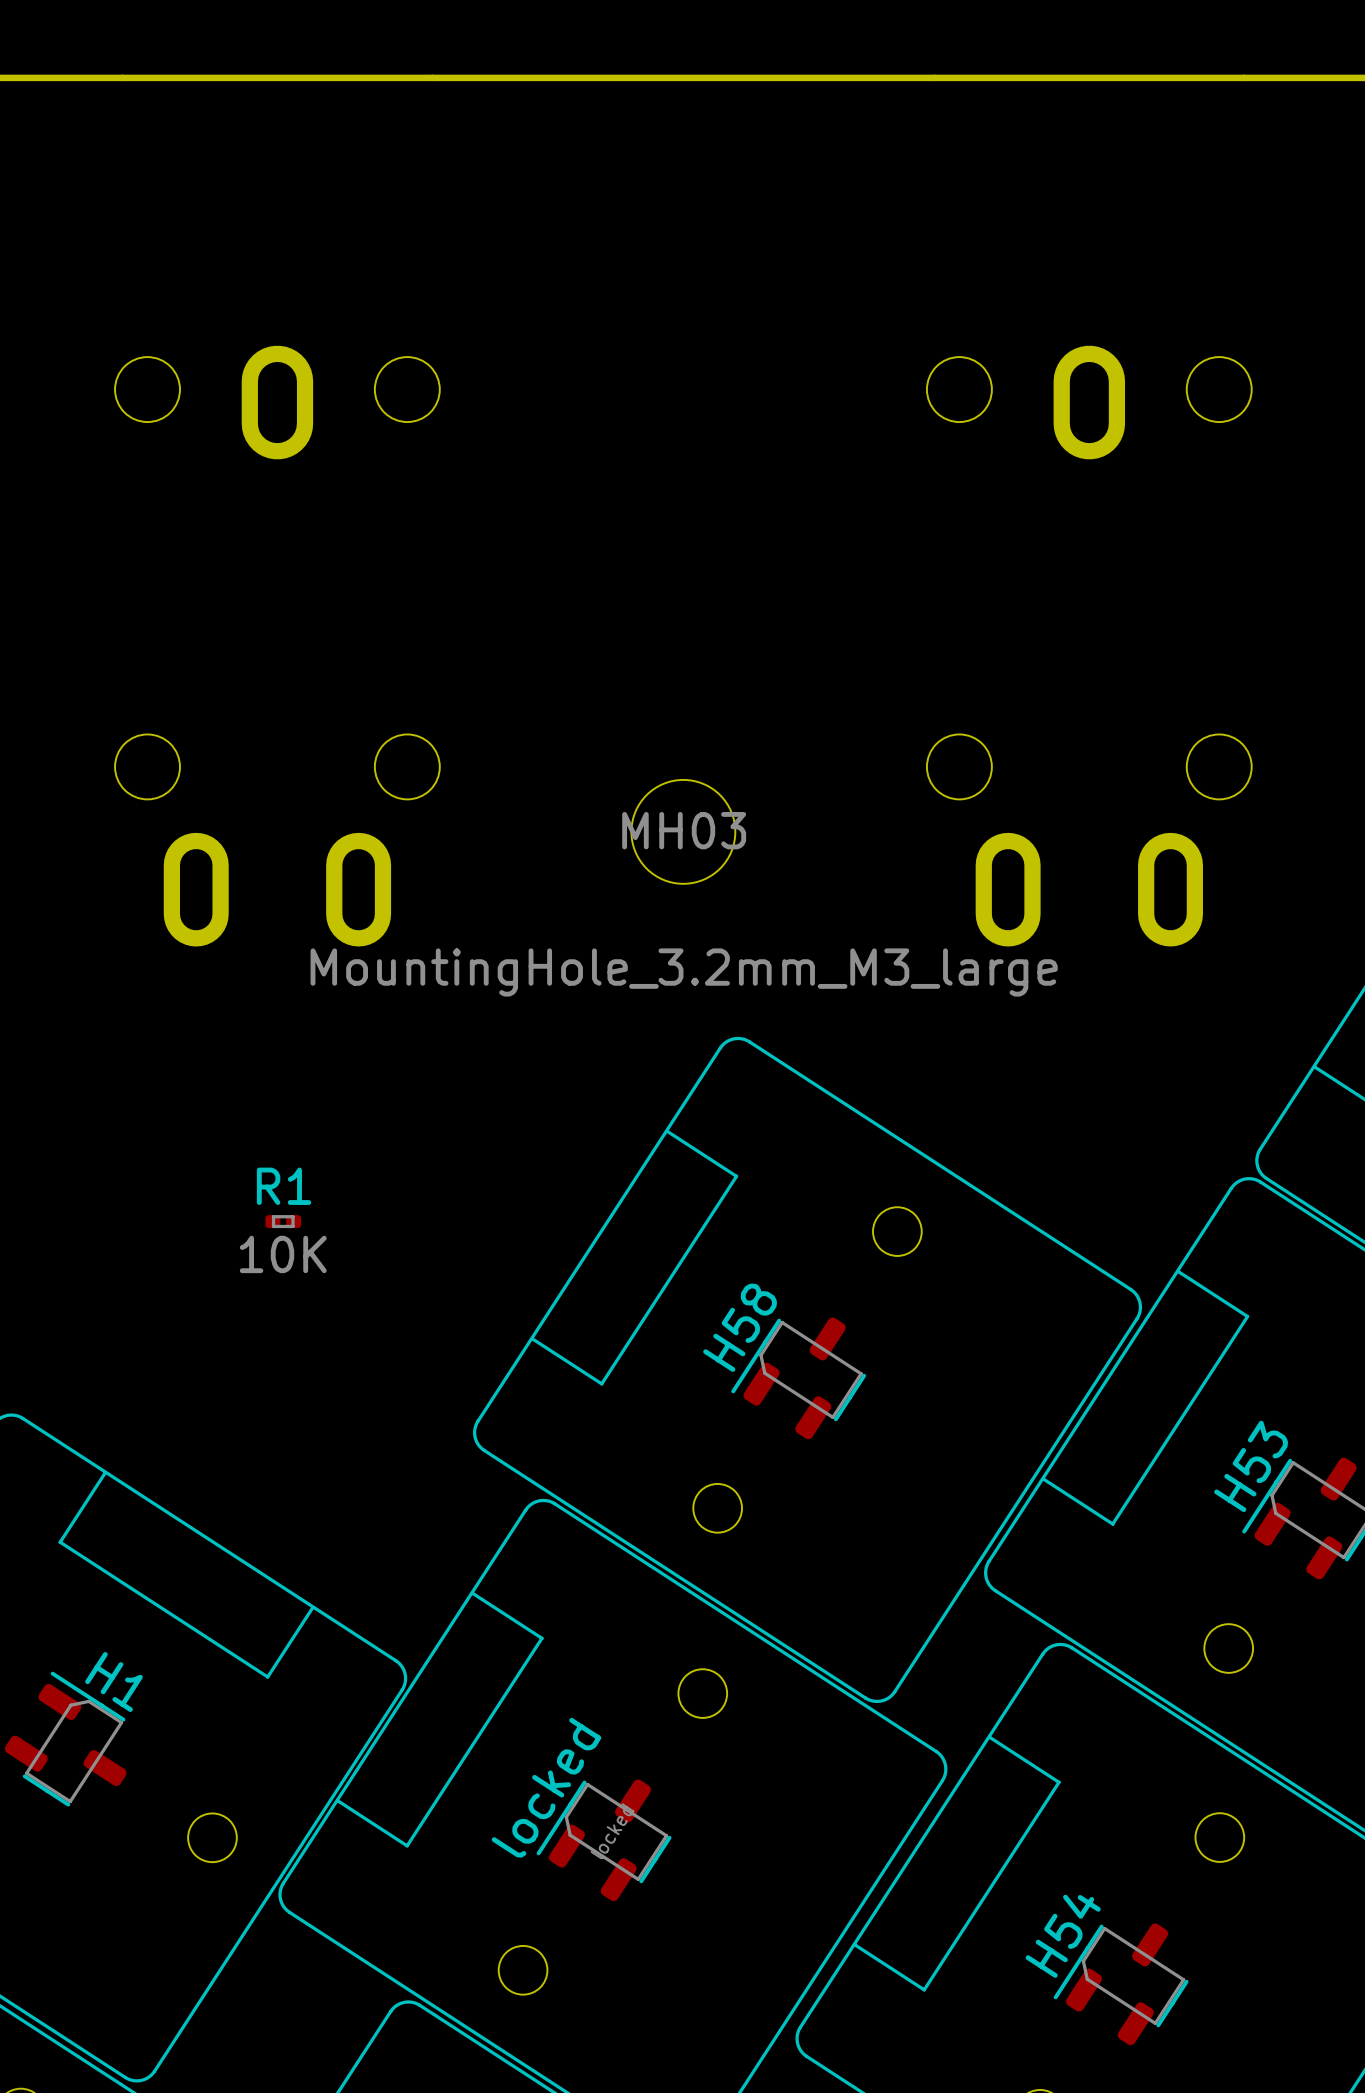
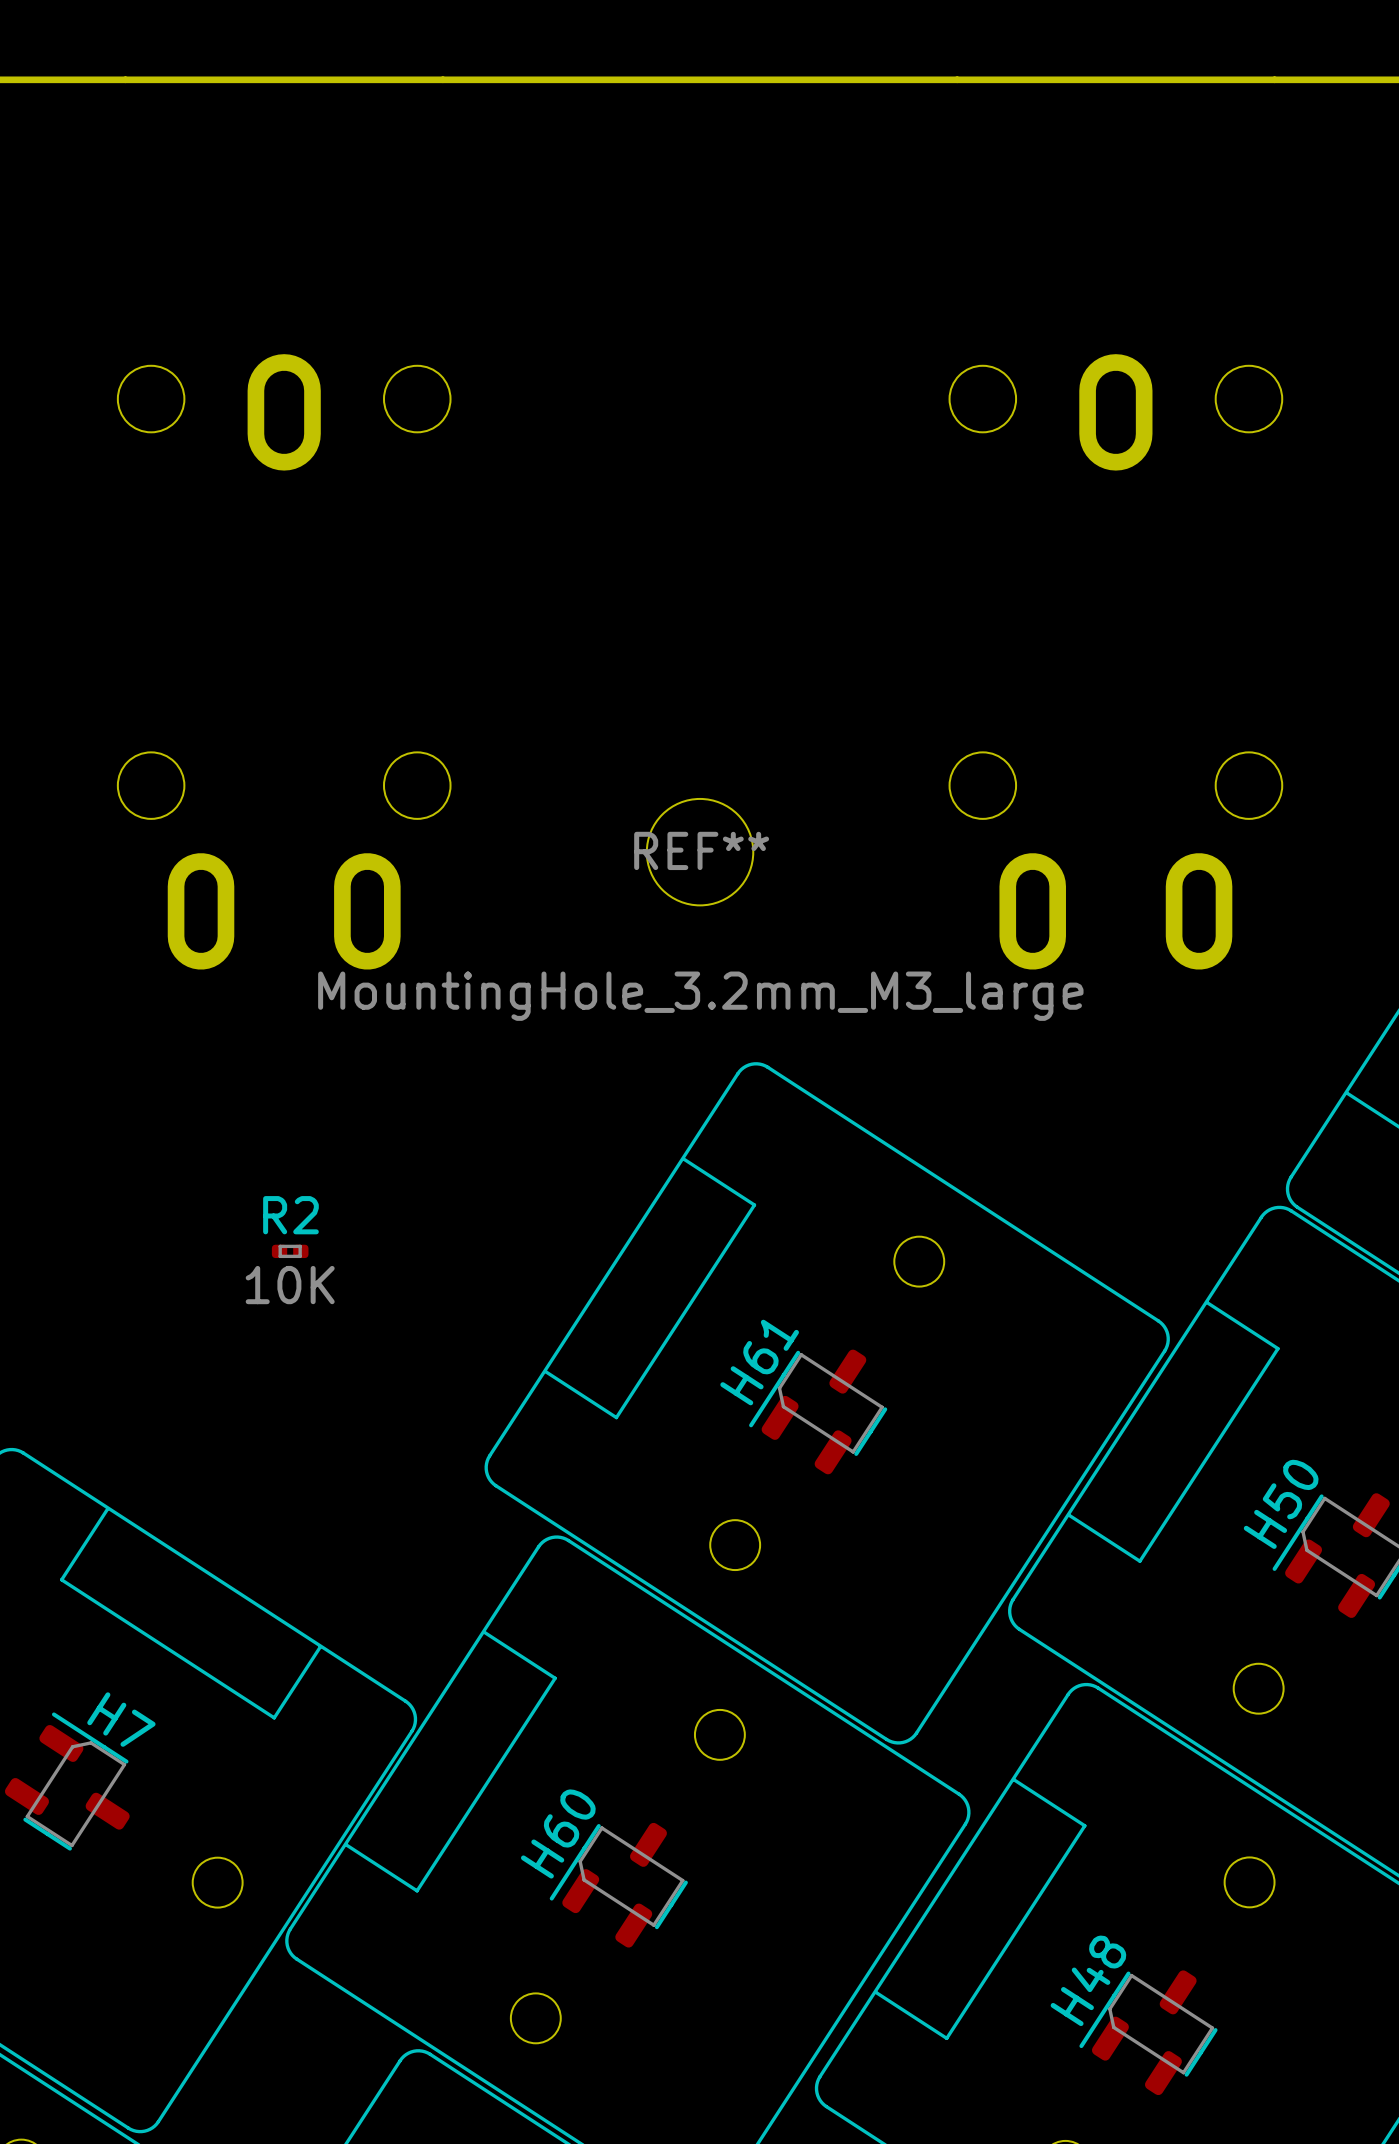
MH03 name: MH03 (684, 830) -> REF** (701, 850)
R1 name: R1 (284, 1186) -> R2 (290, 1215)
H58 name: H58 (740, 1327) -> H61 (759, 1362)
H53 name: H53 (1251, 1466) -> H50 (1281, 1504)
H1 name: H1 (113, 1682) -> H7 (121, 1719)
locked name: locked (546, 1787) -> H60 (558, 1833)
locked text: locked (612, 1831) -> none
H54 name: H54 (1063, 1936) -> H48 (1088, 1980)

